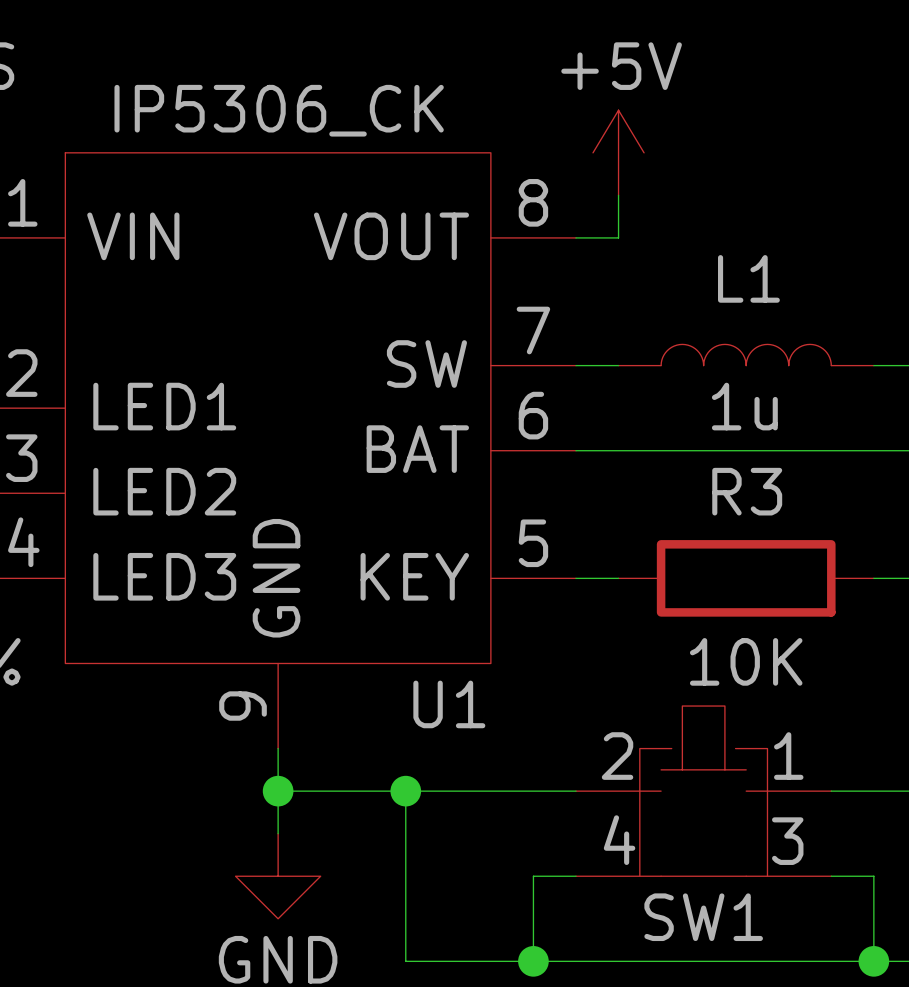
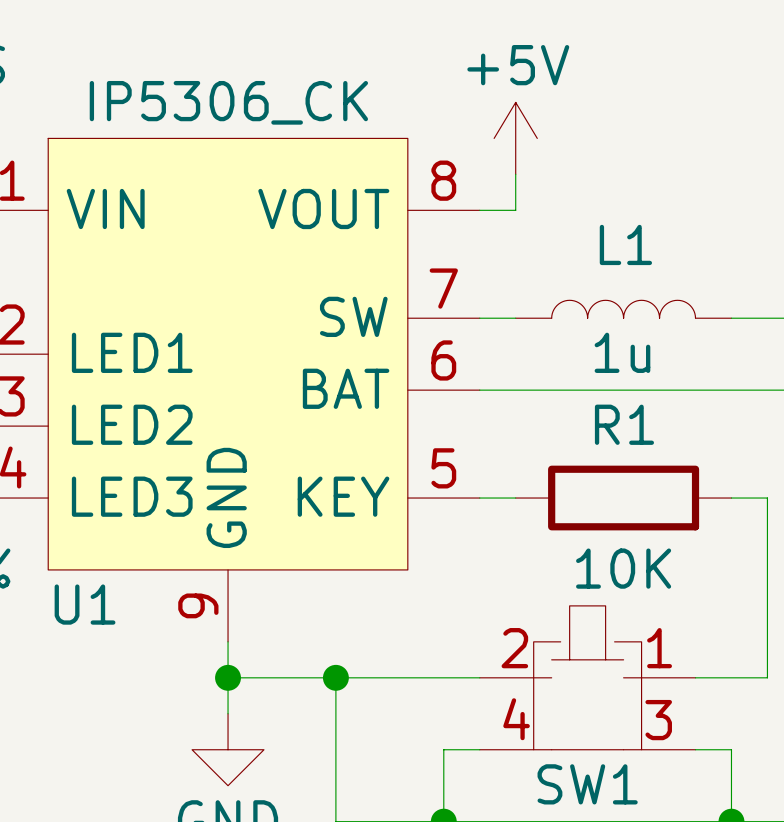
R3 name: R3 (747, 491) -> R1 (624, 424)
U1 name position: U1 (449, 704) -> U1 (85, 604)

